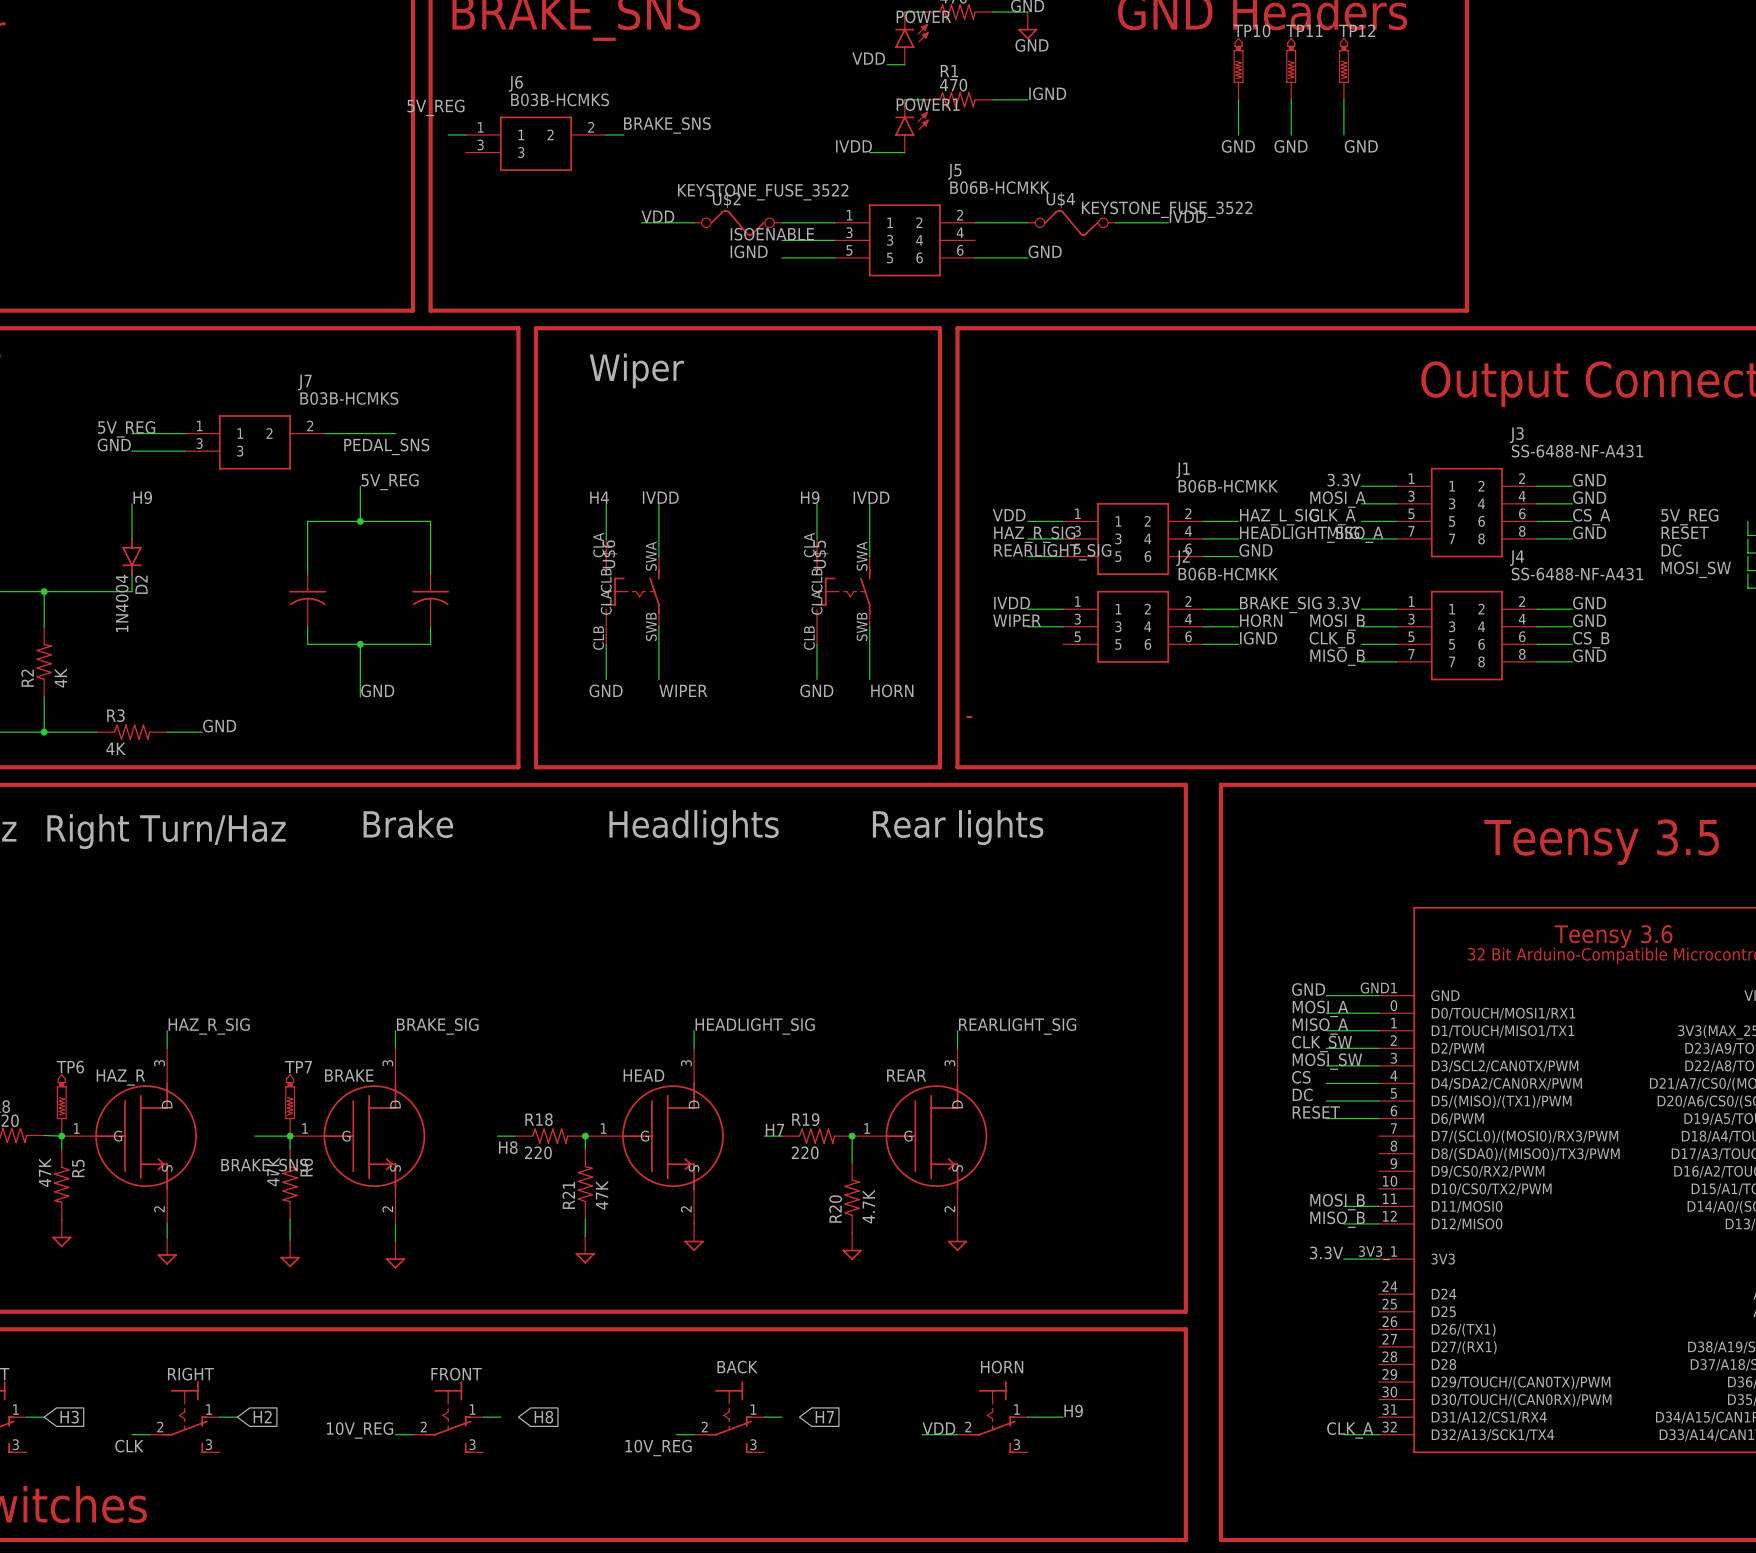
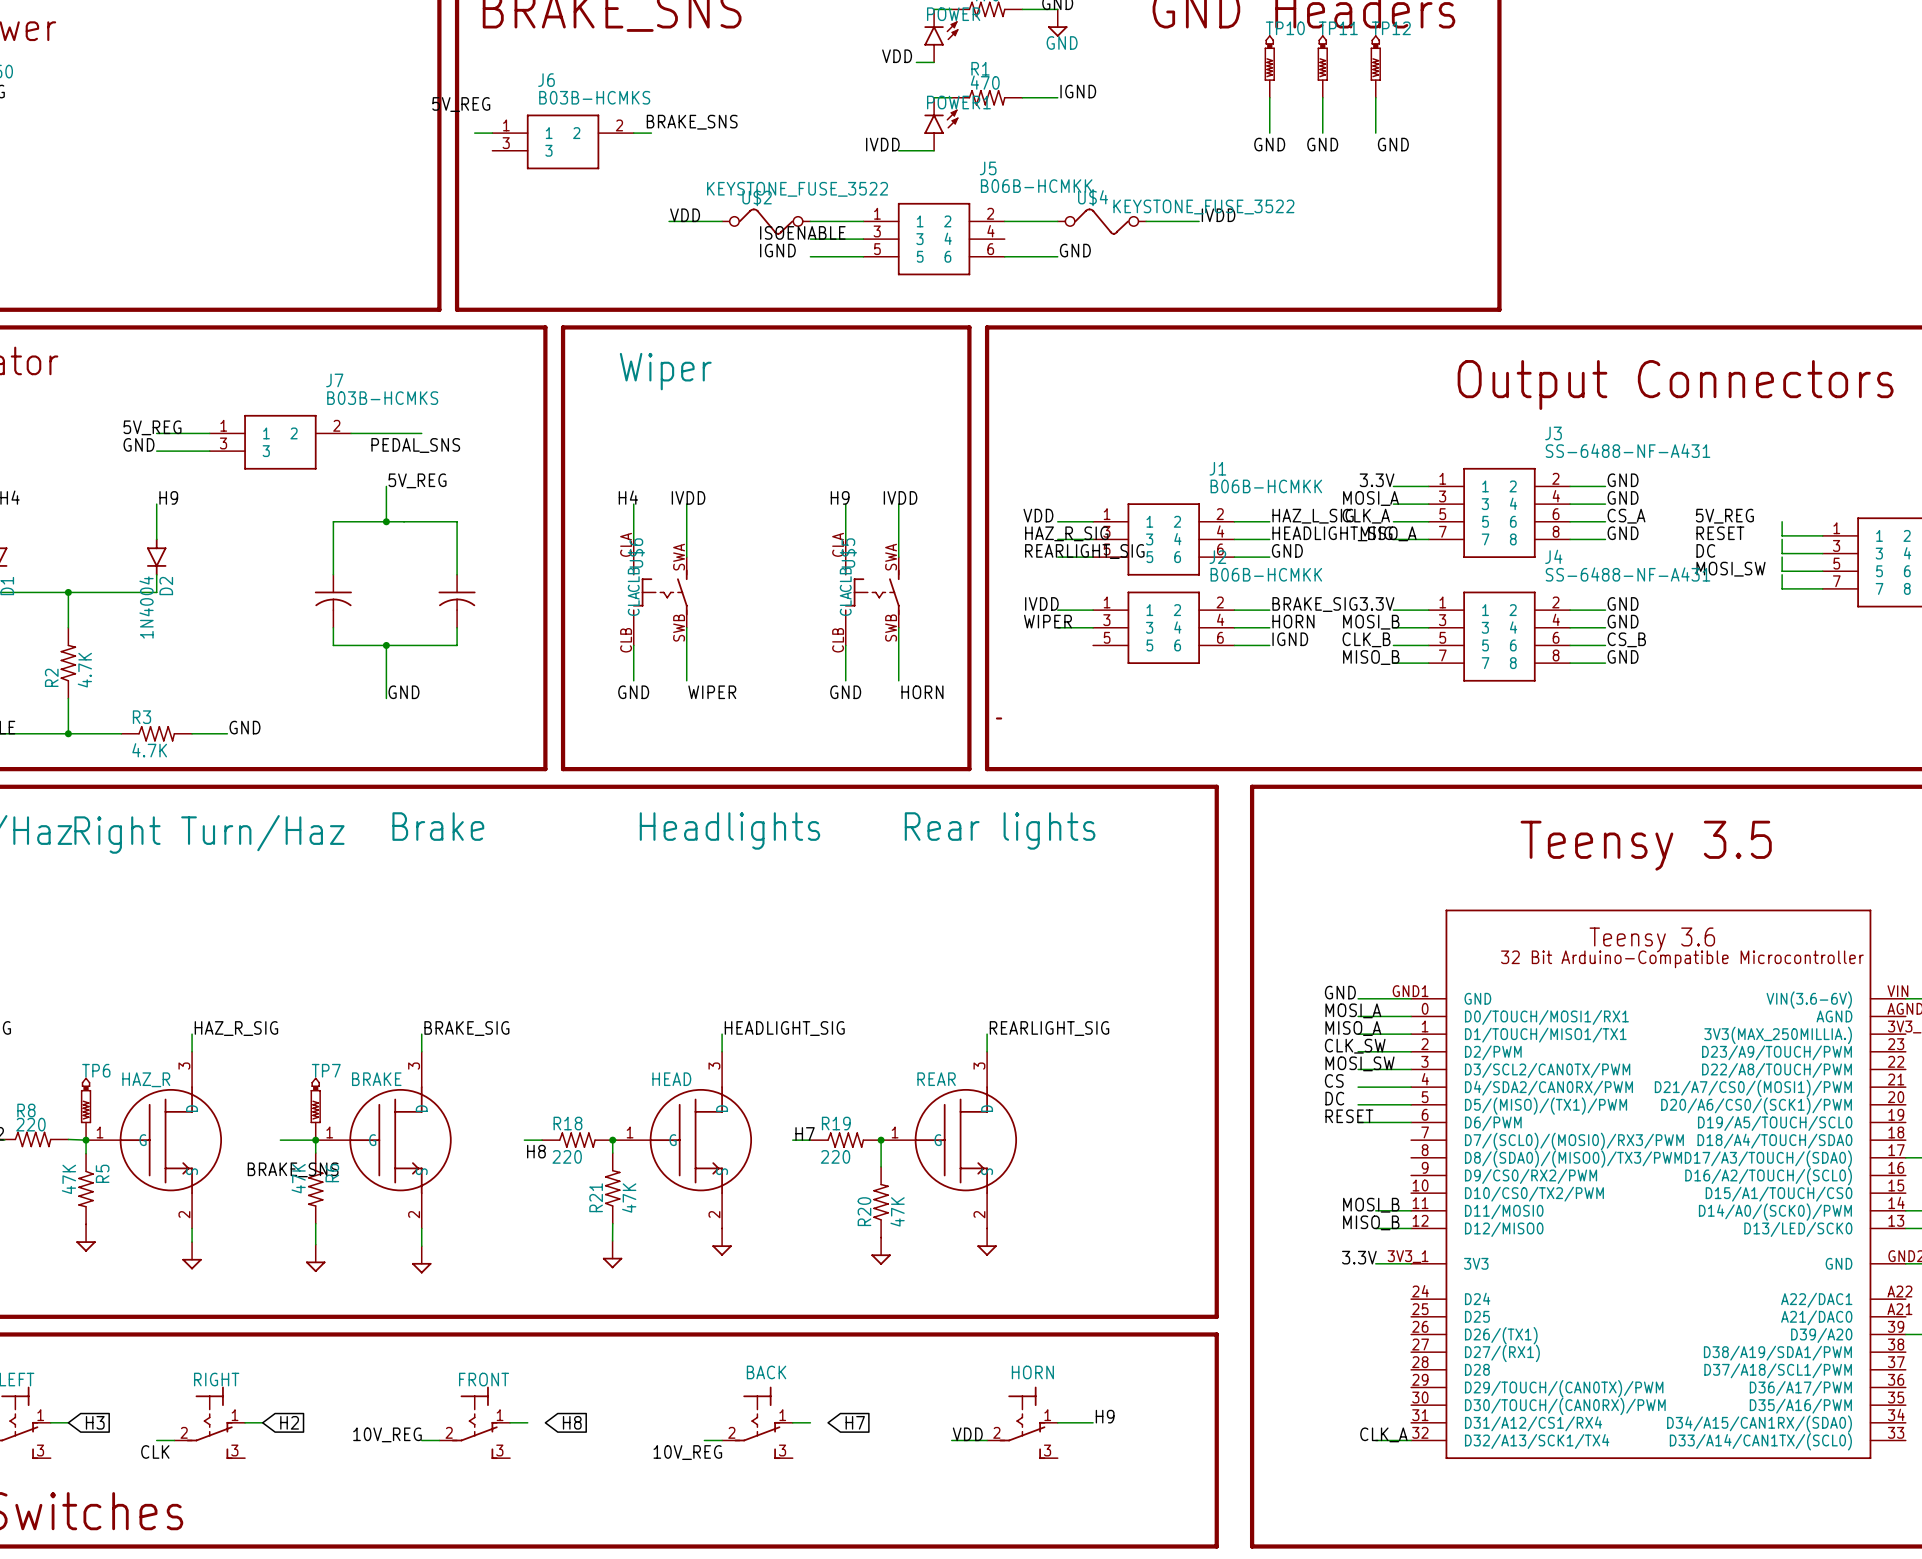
R2 value: 4K (60, 677) -> 4.7K (84, 670)
R3 value: 4K (116, 748) -> 4.7K (149, 750)
R20 value: 4.7K (868, 1206) -> 47K (897, 1211)

